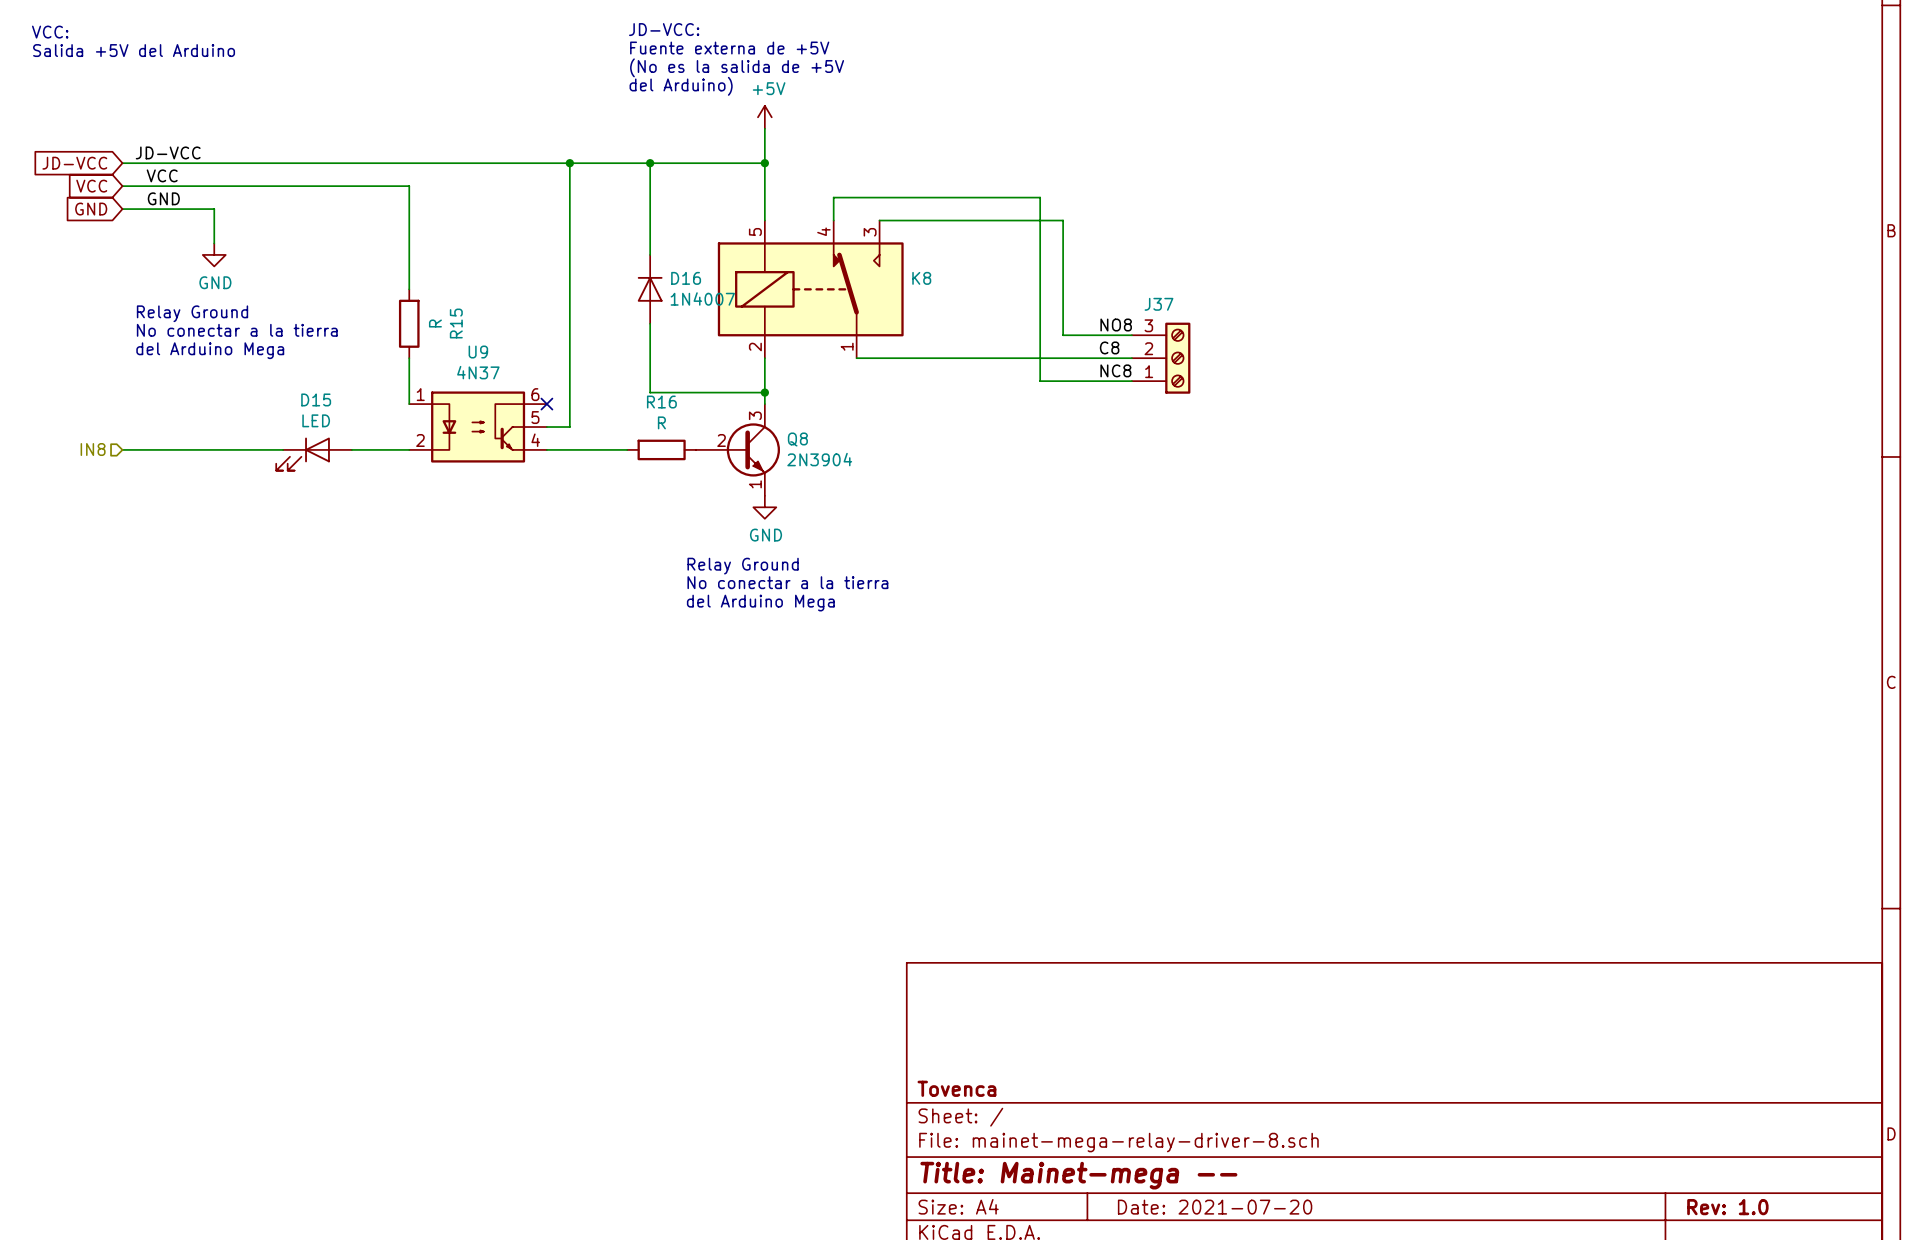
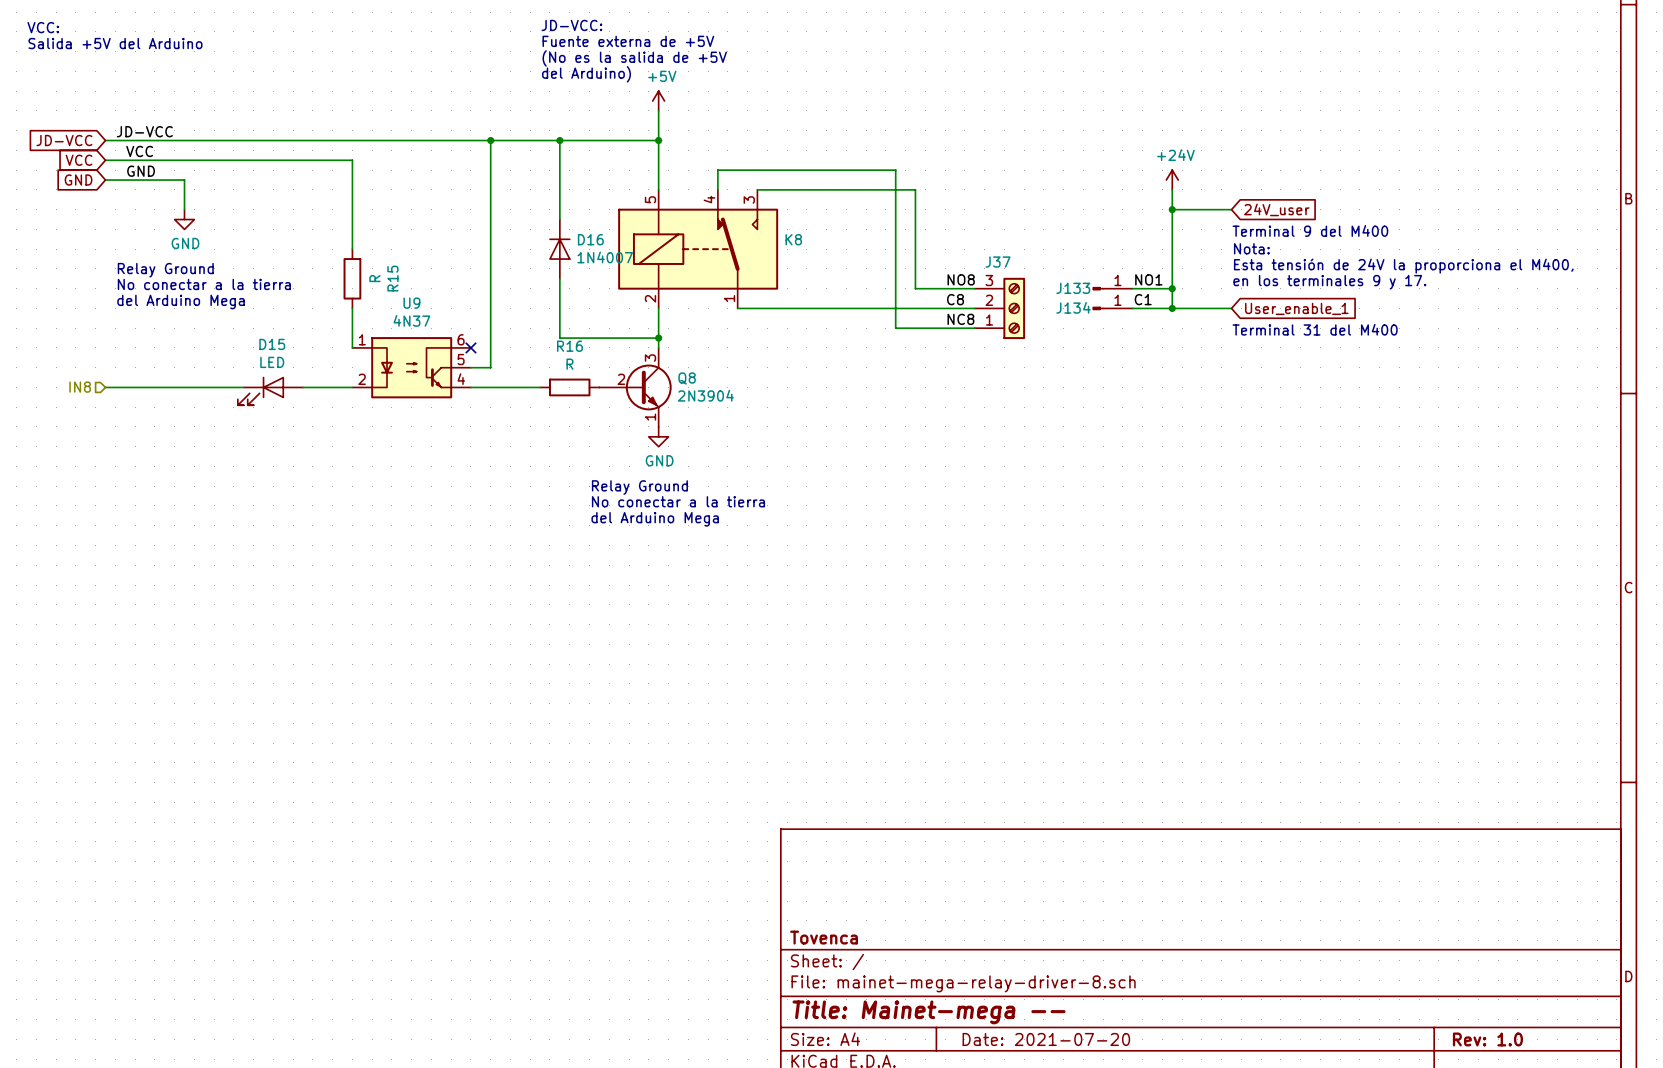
power symbol: none -> +24V (1172, 180)
wire: none -> (1172, 189) (1172, 308)
wire: none -> (1172, 209) (1231, 209)
junction: none -> (1172, 209)
global label: none -> 24V_user (1276, 209)
text: none -> Terminal 9 del M400 (1310, 230)
text: none -> Nota: (1251, 248)
text: none -> Esta tensión de 24V la proporciona el M400, (1403, 266)
label: none -> NO1 (1148, 279)
text: none -> en los terminales 9 y 17. (1329, 282)
J133: none -> (1112, 288)
wire: none -> (1132, 288) (1172, 288)
junction: none -> (1172, 288)
label: none -> C1 (1143, 299)
J134: none -> (1112, 308)
wire: none -> (1132, 308) (1231, 308)
junction: none -> (1172, 308)
global label: none -> User_enable_1 (1296, 308)
text: none -> Terminal 31 del M400 (1315, 329)

